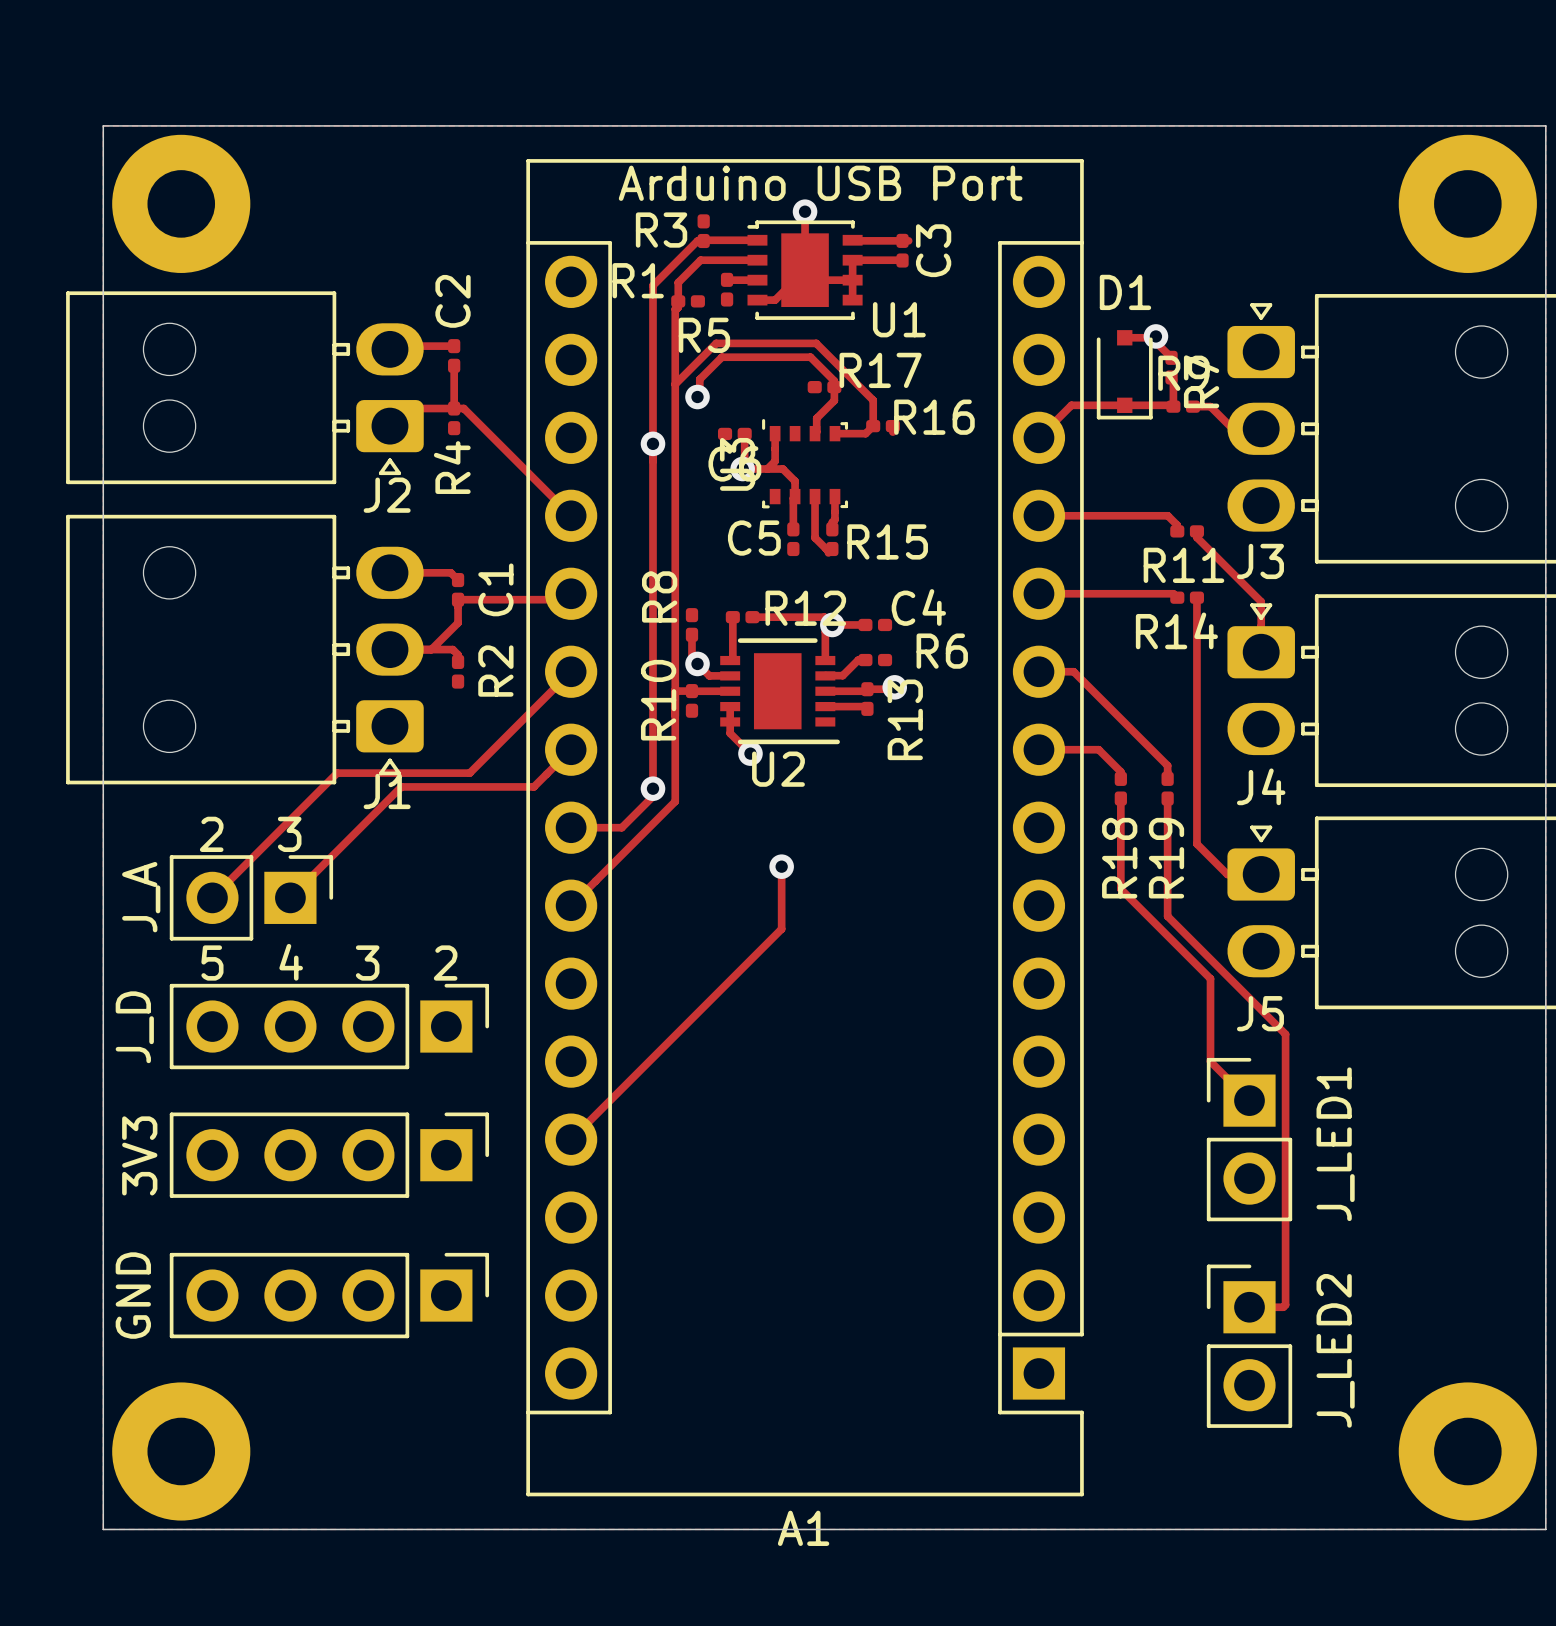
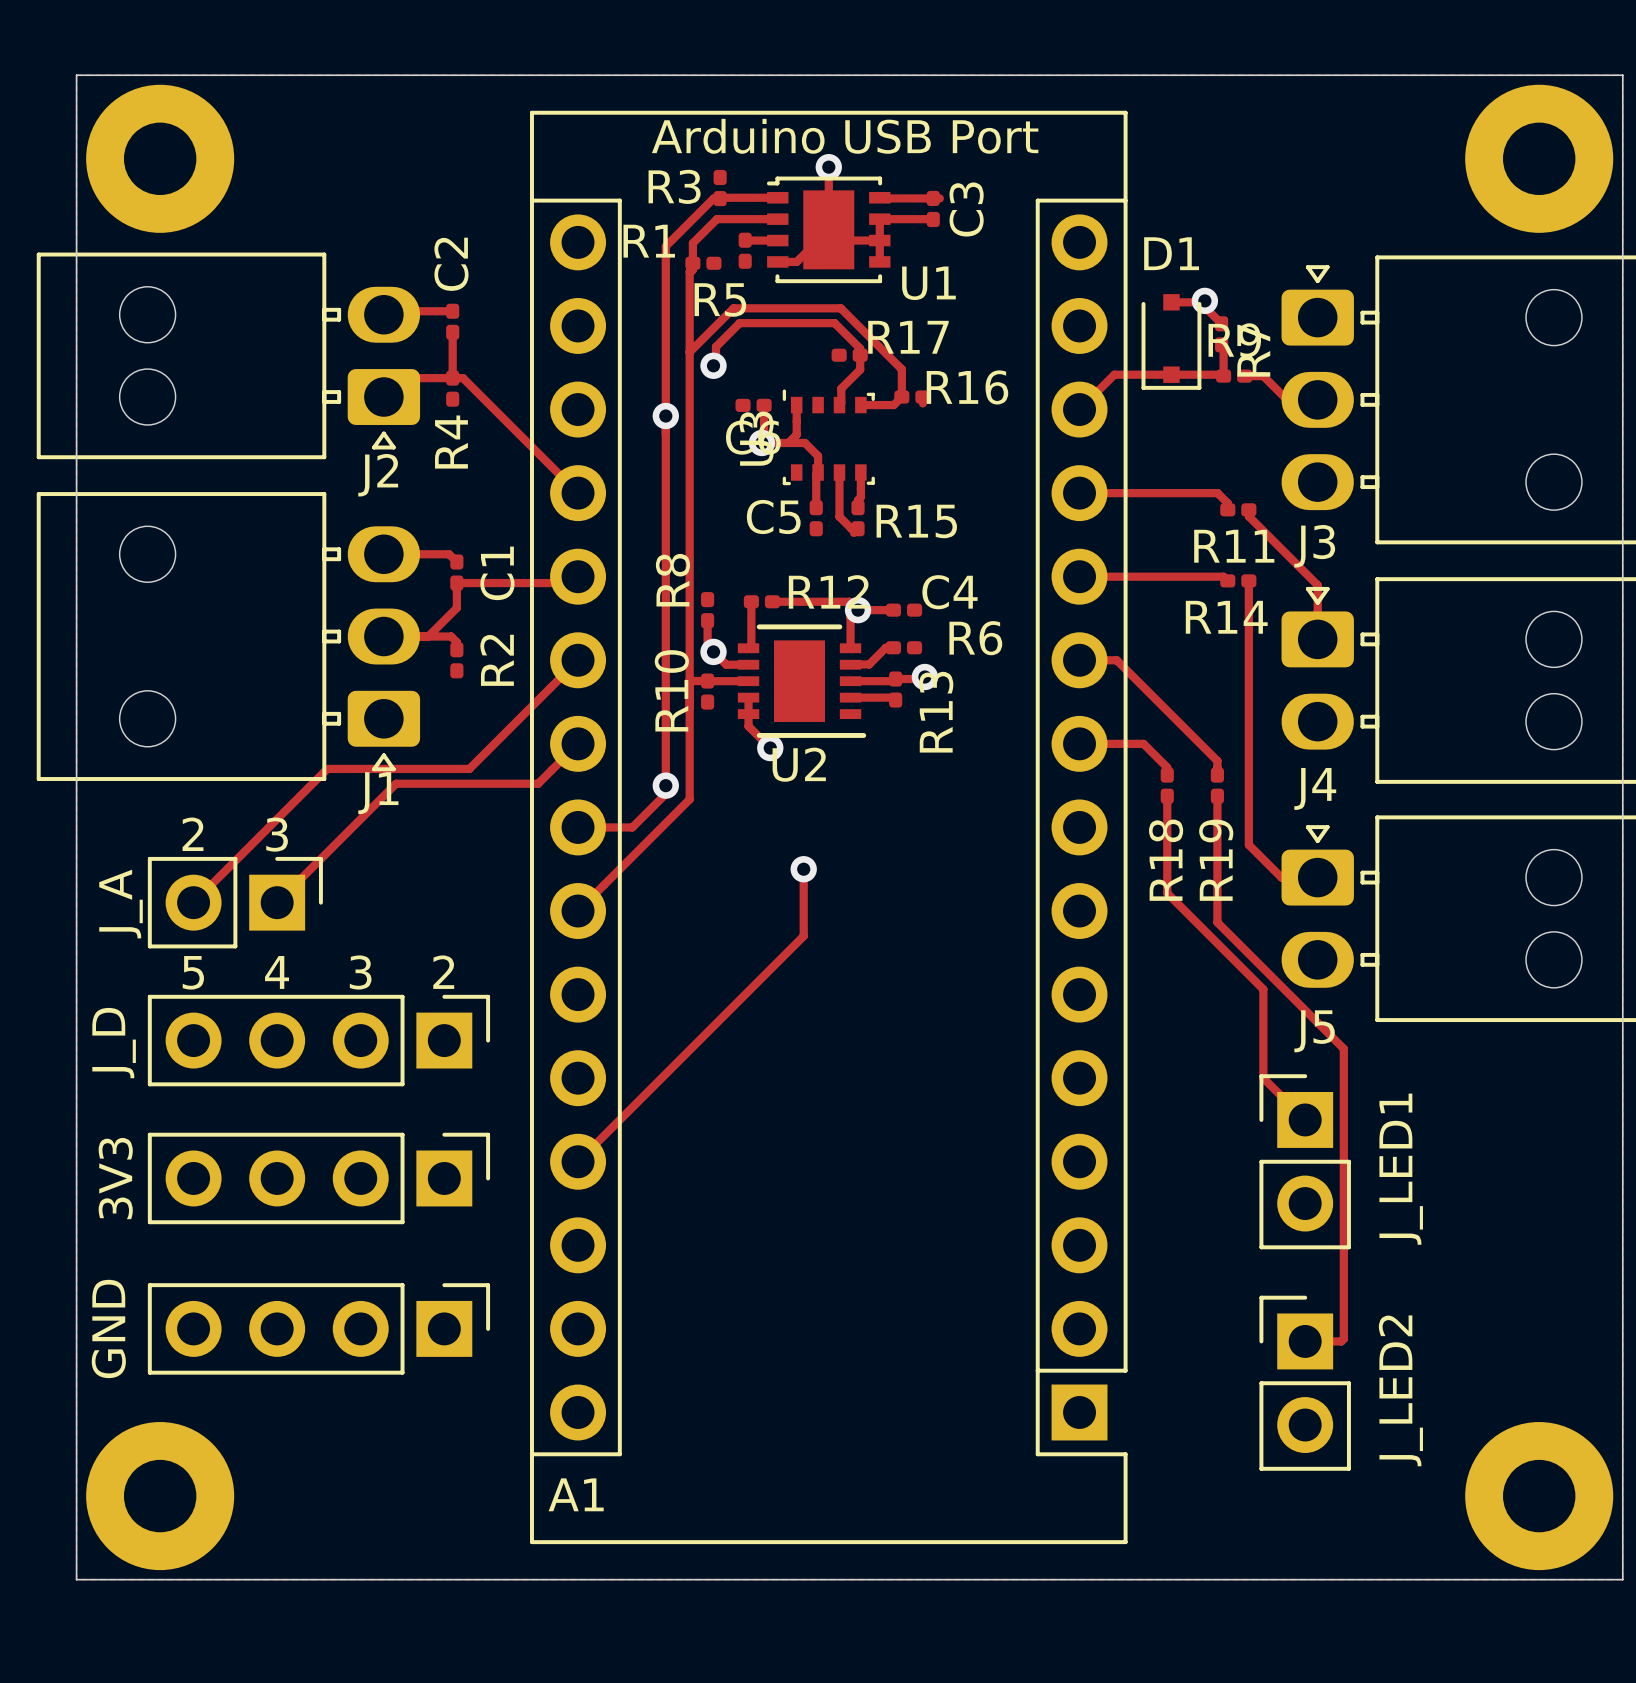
A1 name position: A1 (803, 1528) -> A1 (576, 1494)

